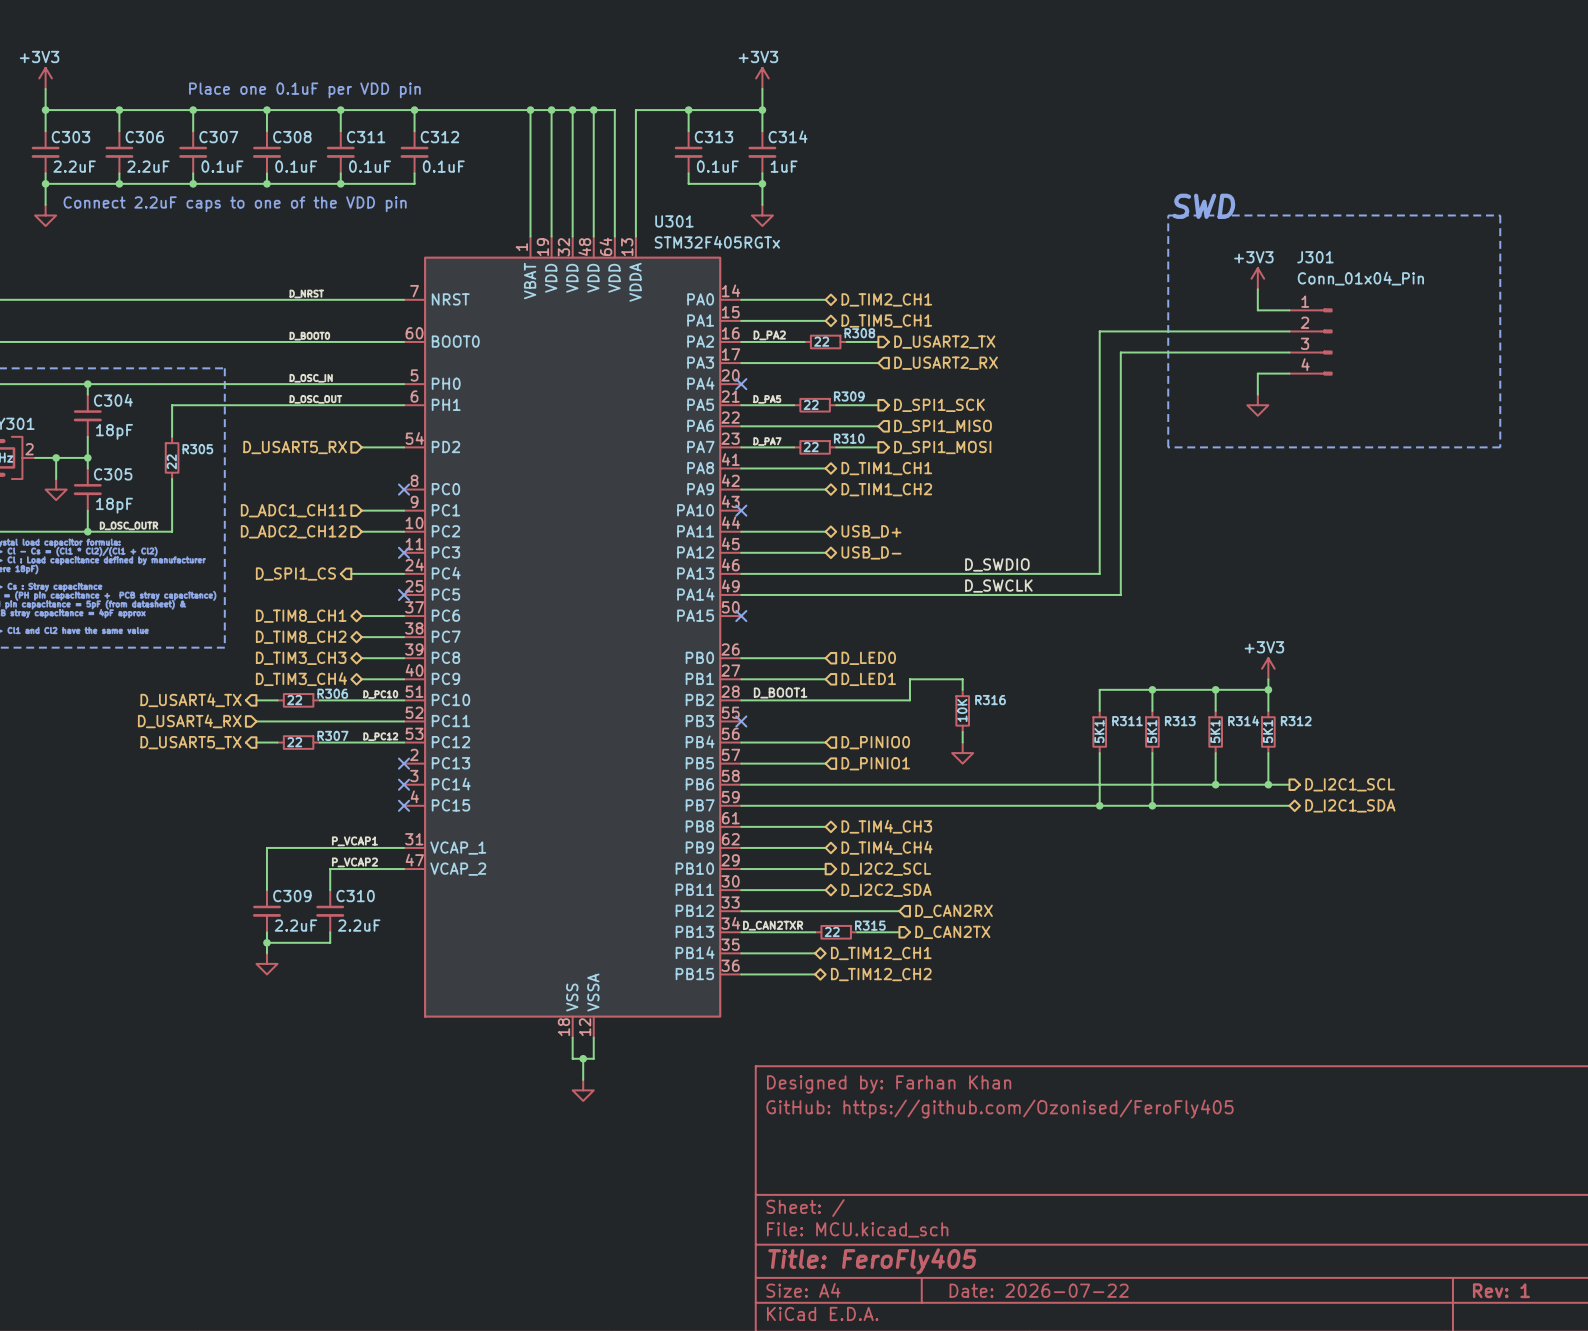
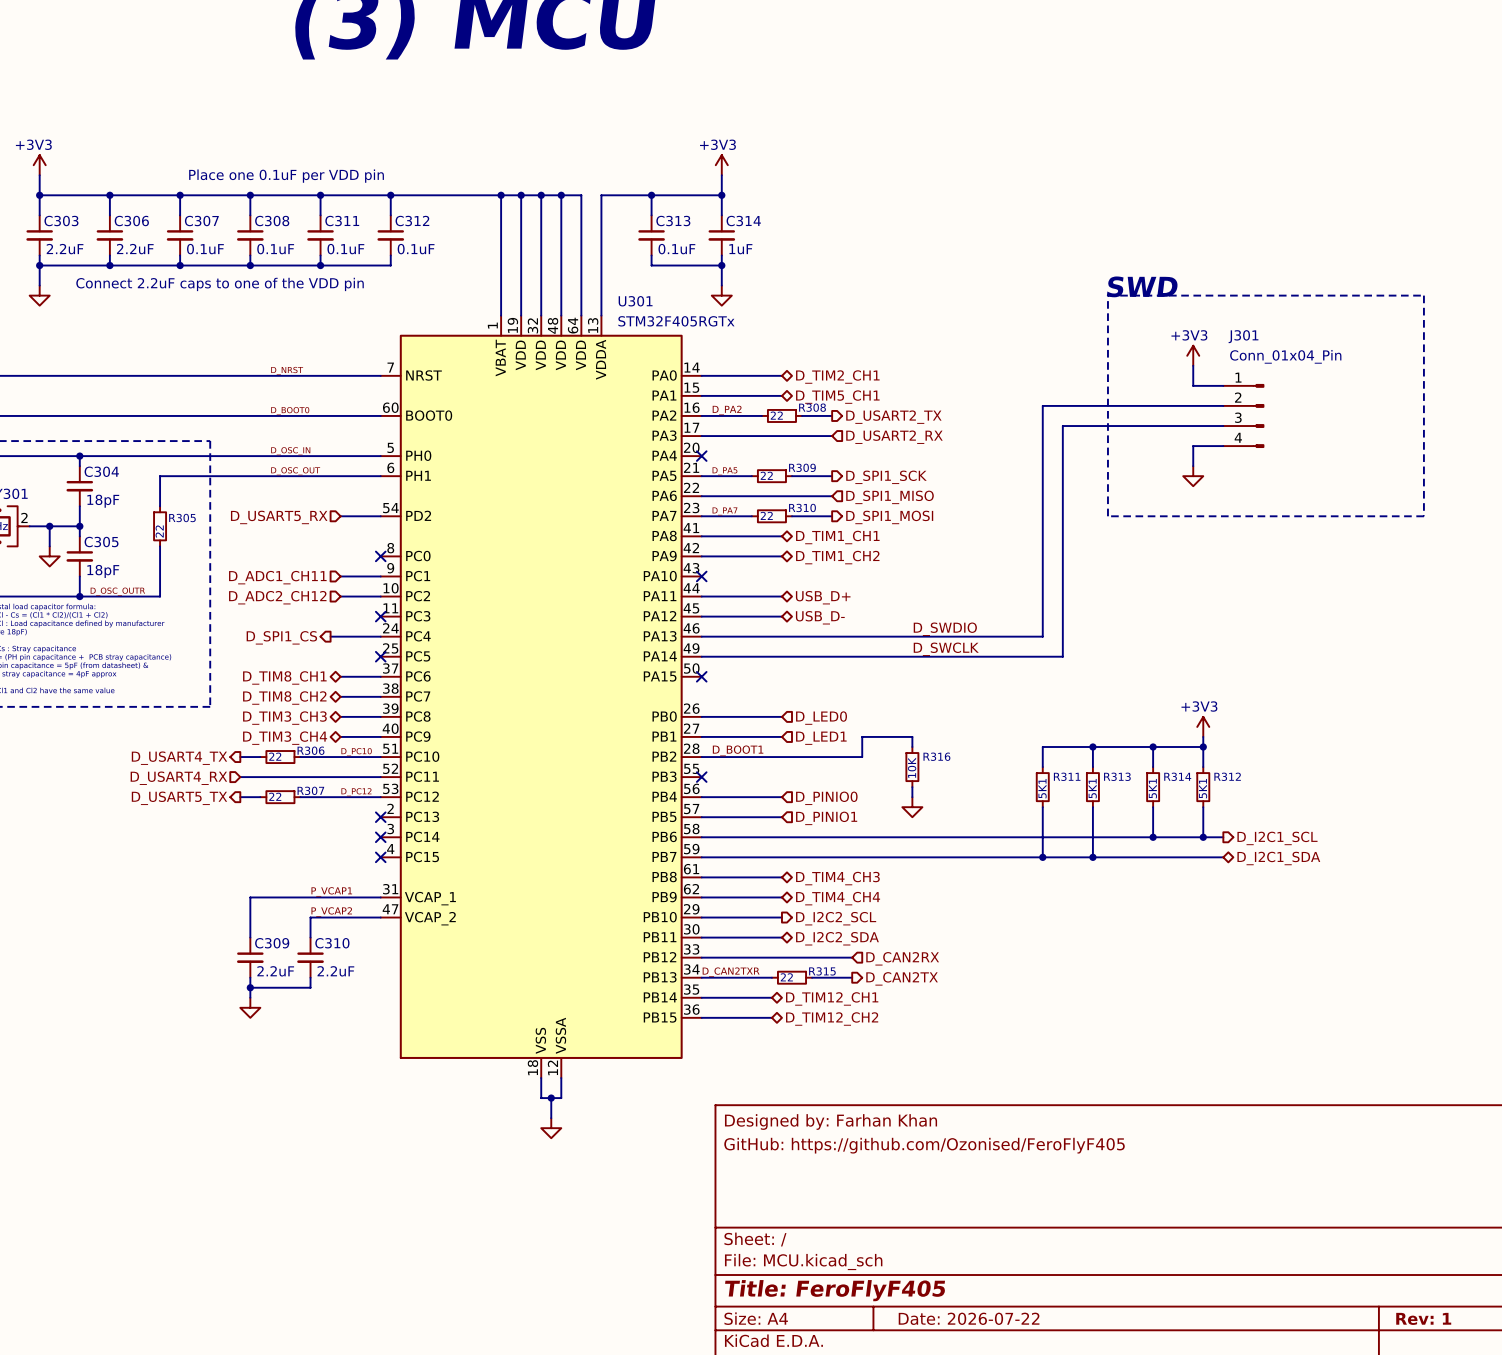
title block: GitHub: https://github.com/Ozonised/FeroFly405 (999, 1109) -> GitHub: https://github.com/Ozonised/FeroFlyF405 (924, 1145)
title block: Title: FeroFly405 (872, 1261) -> Title: FeroFlyF405 (835, 1290)

